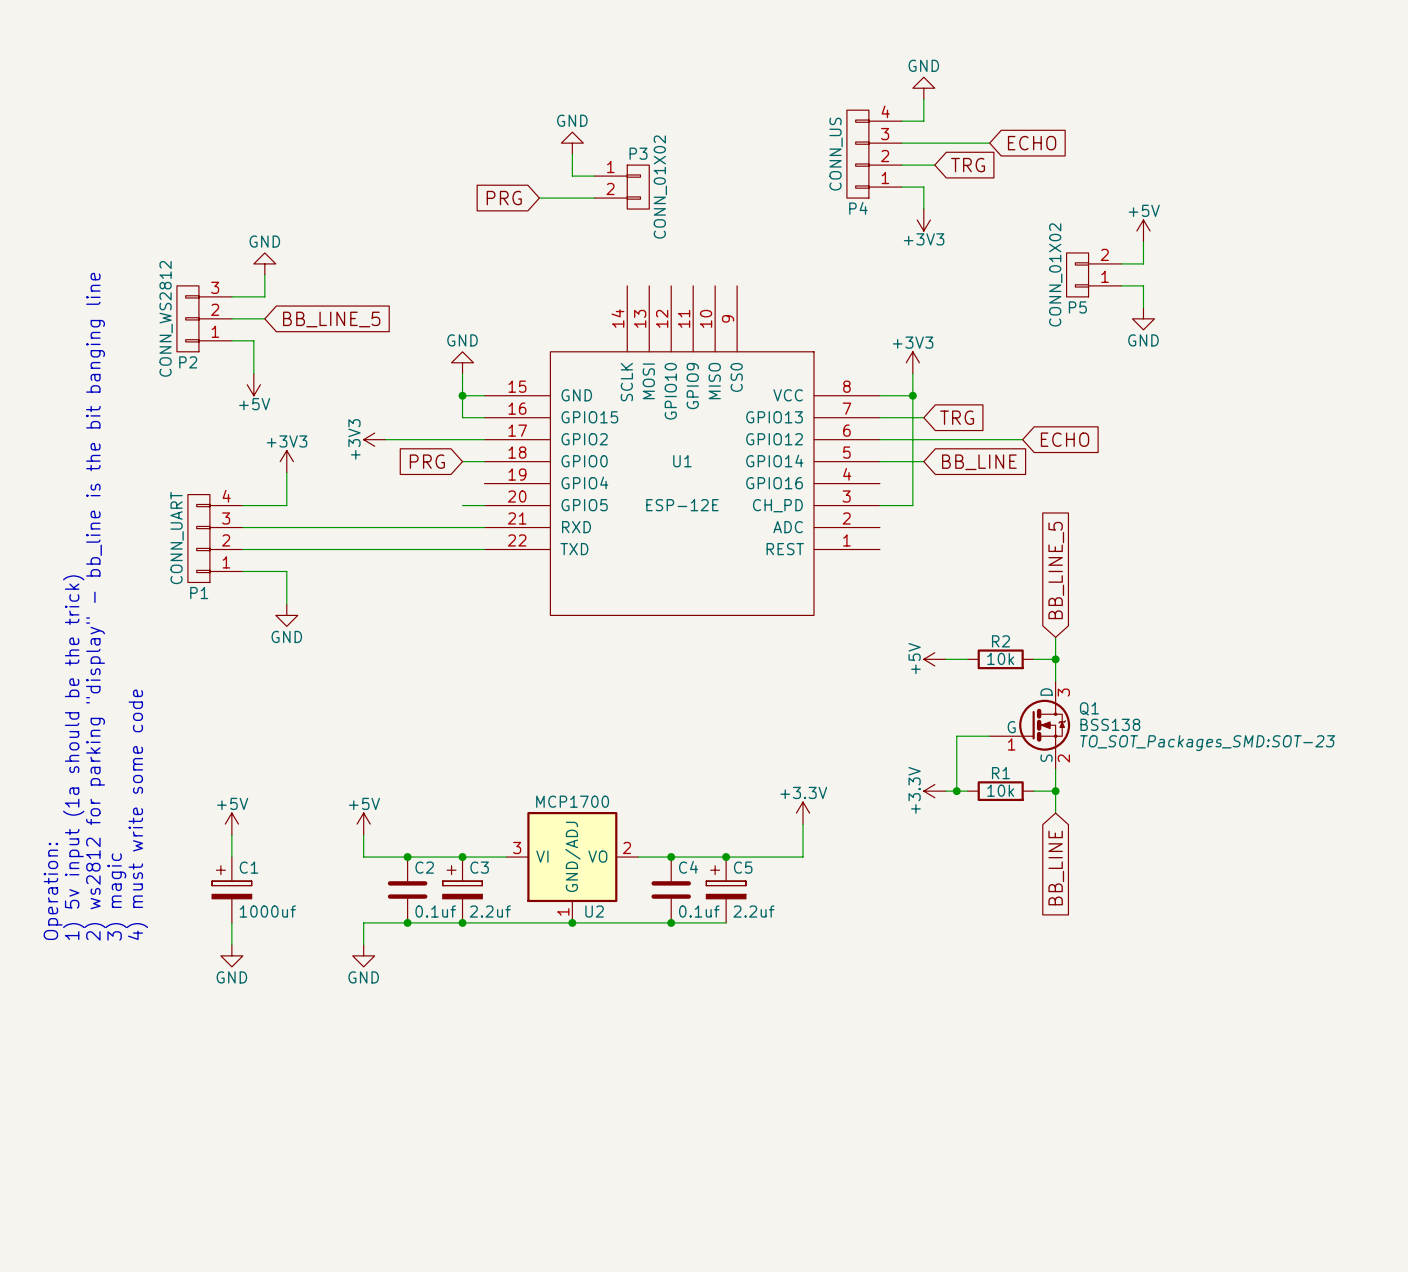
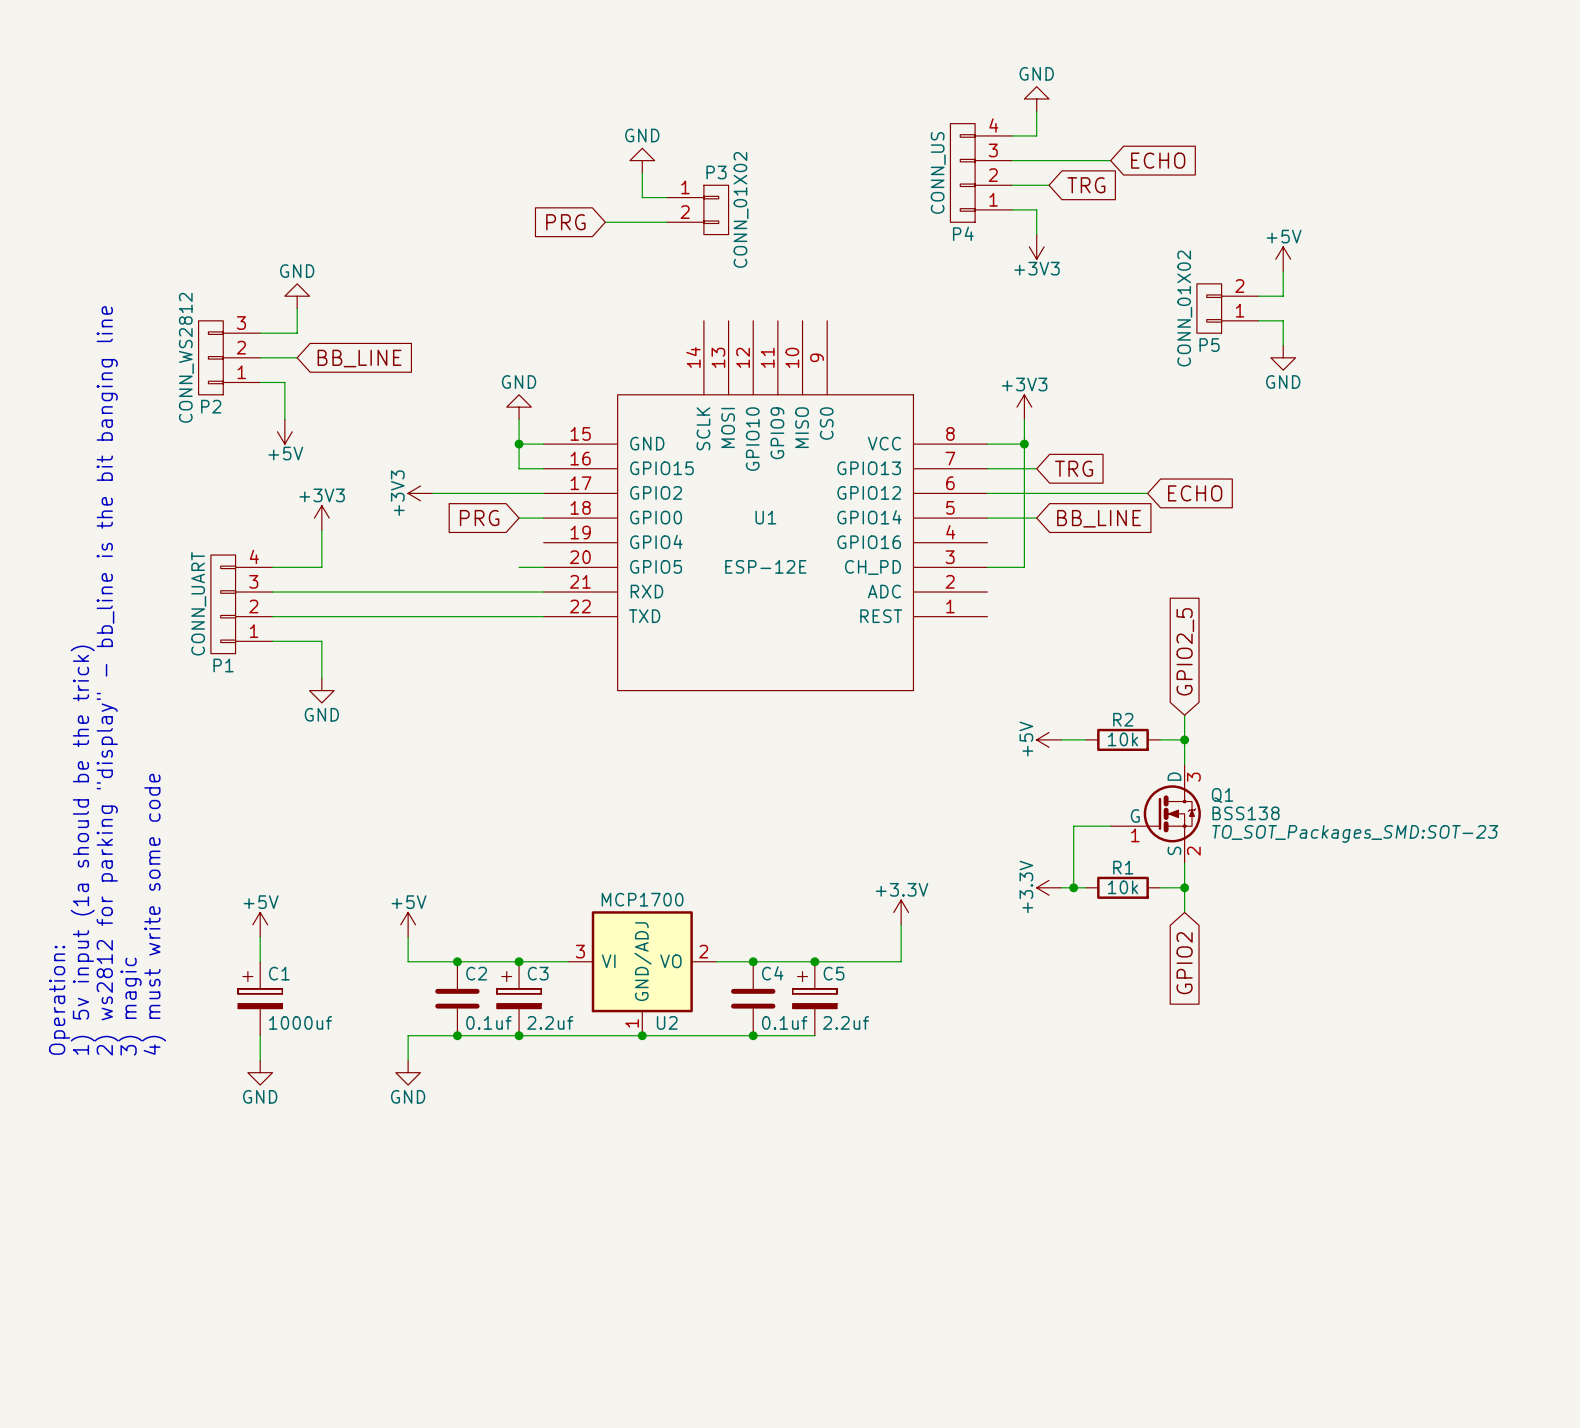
global label: BB_LINE_5 (331, 319) -> BB_LINE (359, 358)
global label: BB_LINE_5 (1056, 570) -> GPIO2_5 (1185, 651)
global label: BB_LINE (1056, 868) -> GPIO2 (1184, 963)

